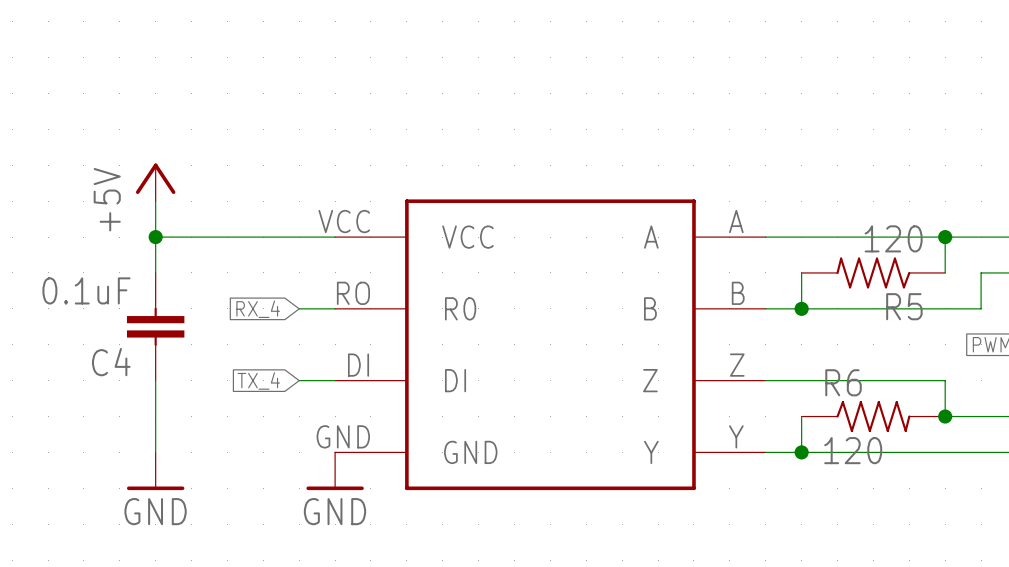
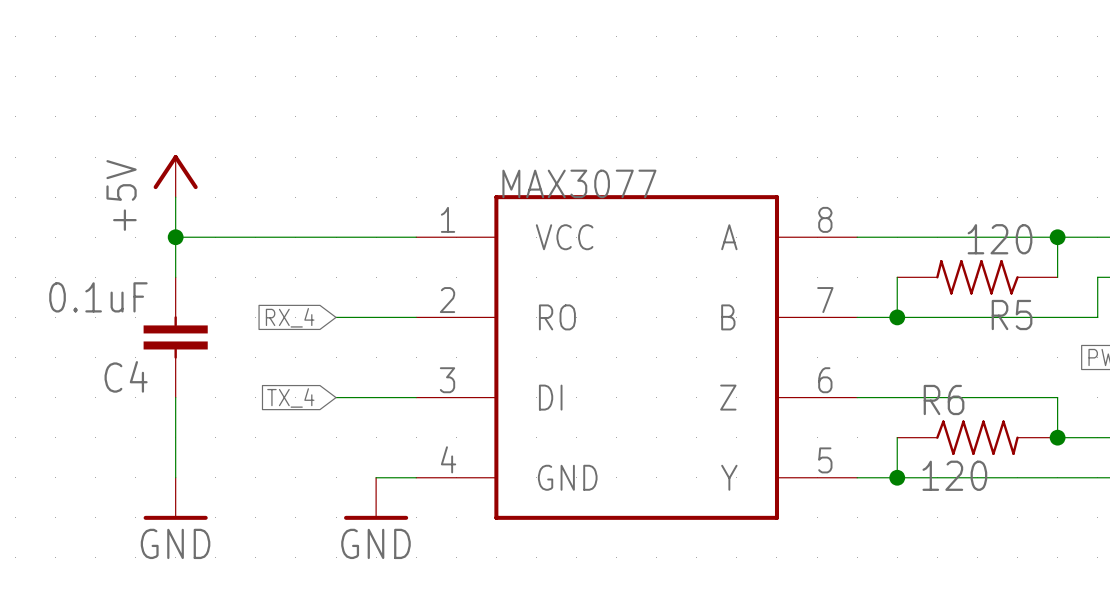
part: (550, 344) -> none
part: none -> (636, 357)

